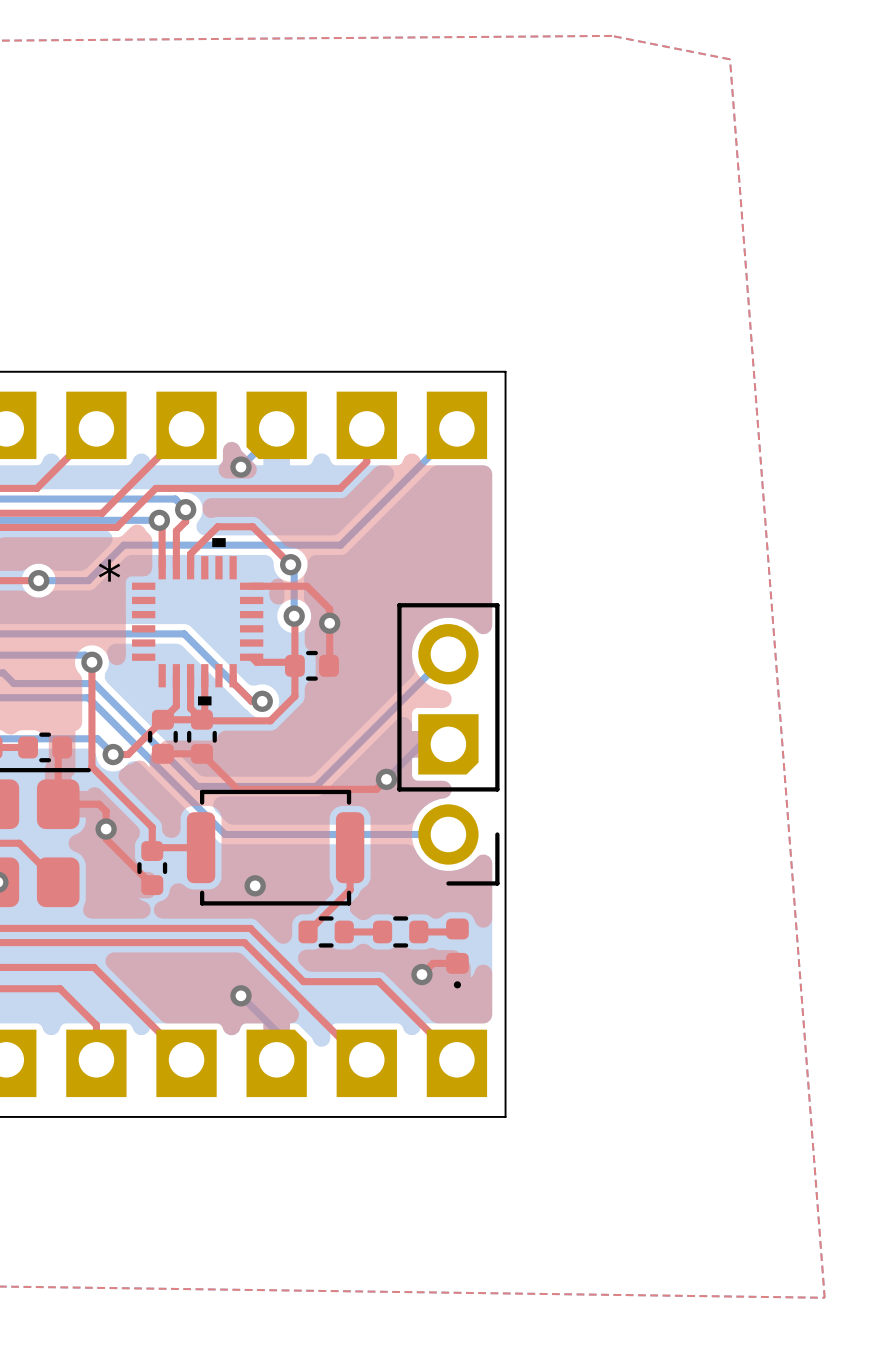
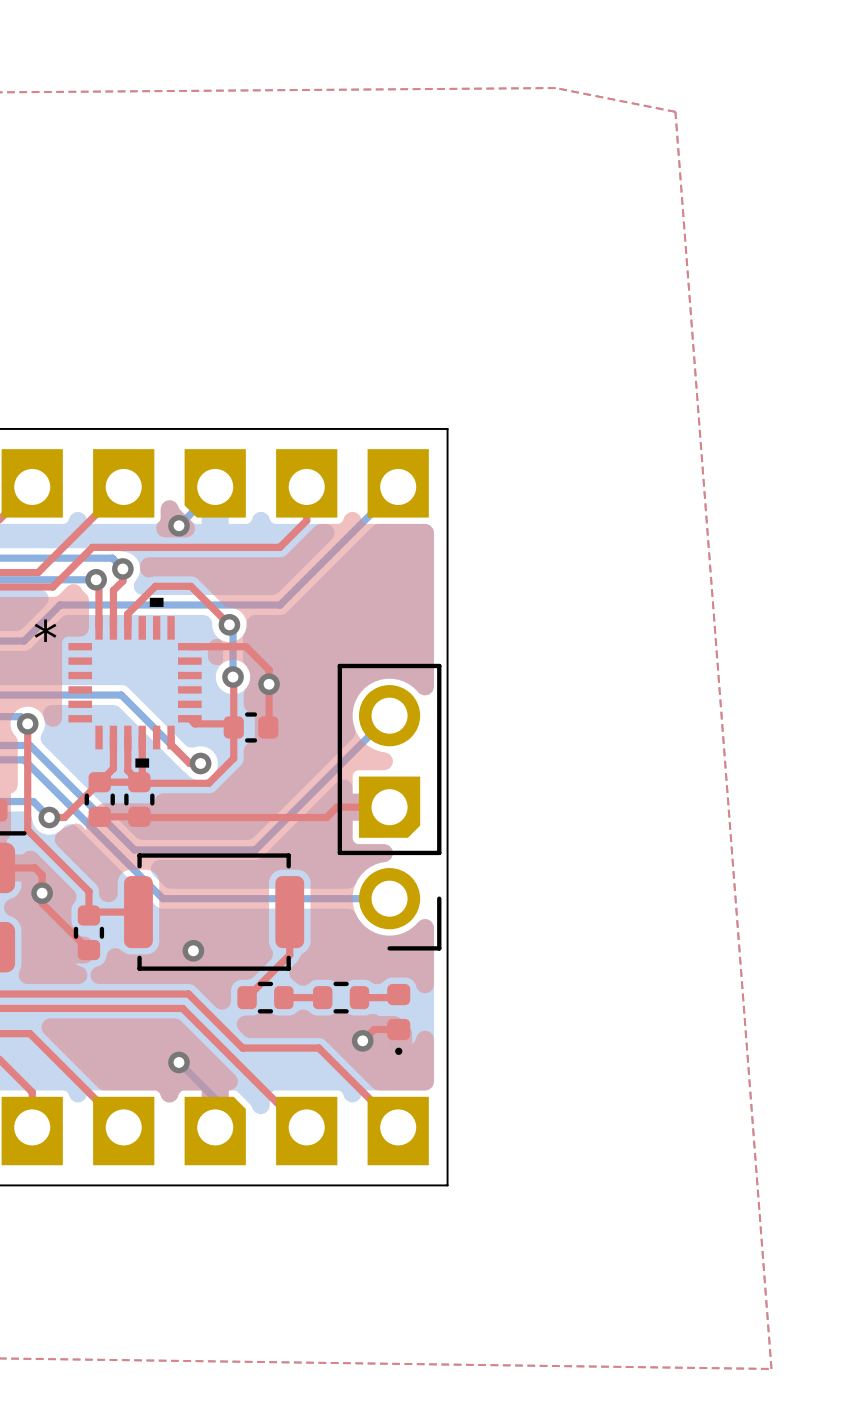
top track: (202, 754) (237, 789) (376, 789) (386, 779) -> (140, 817) (326, 817) (337, 807) (389, 807)
via: (386, 779) -> none

